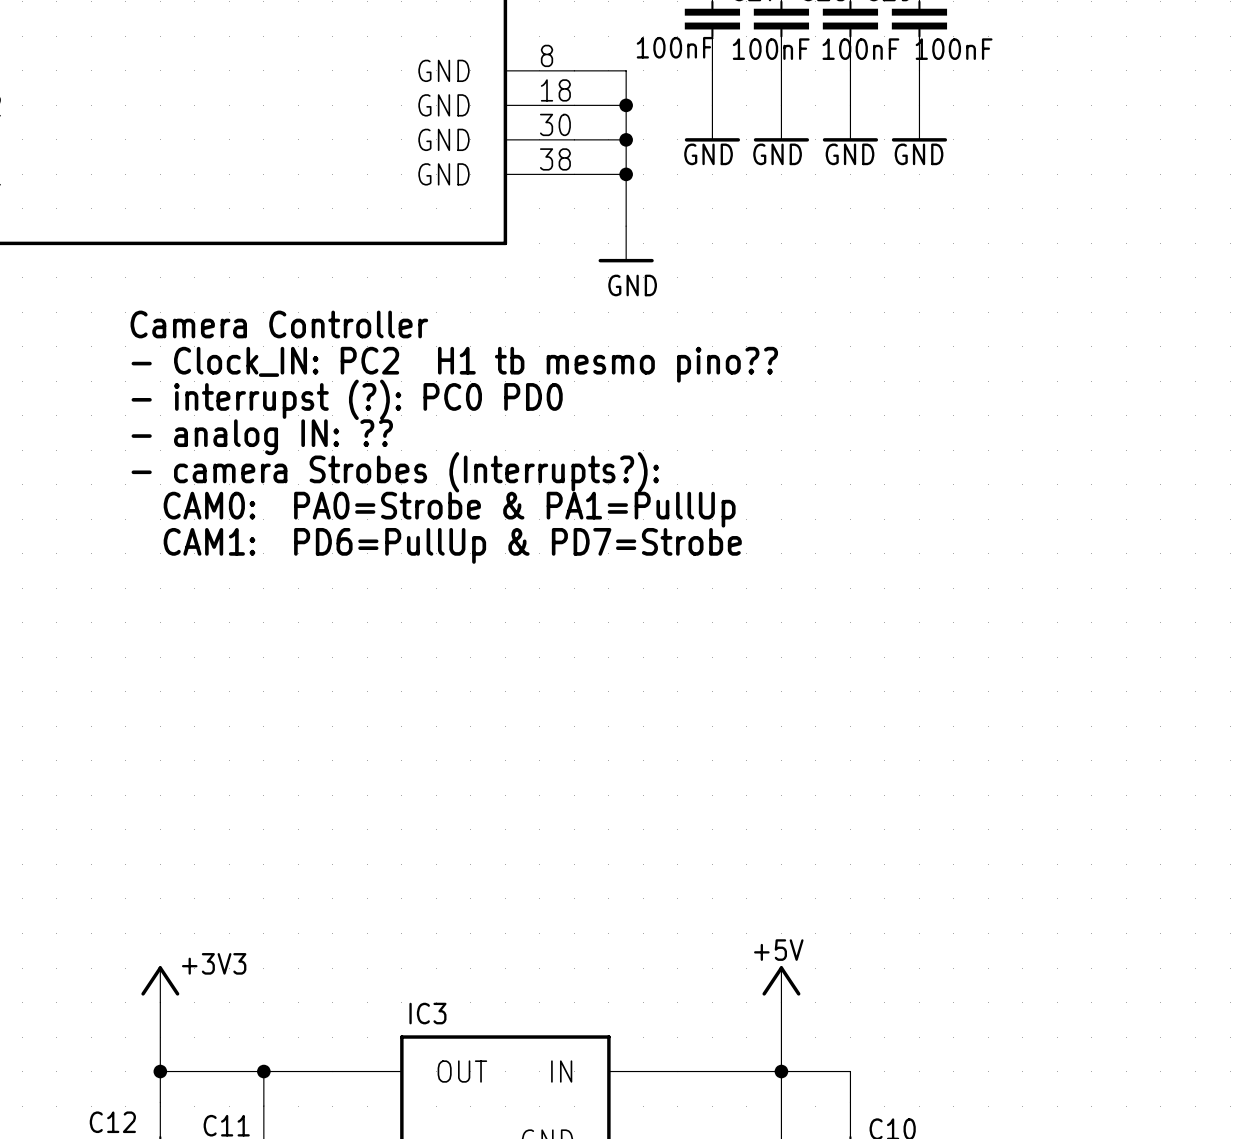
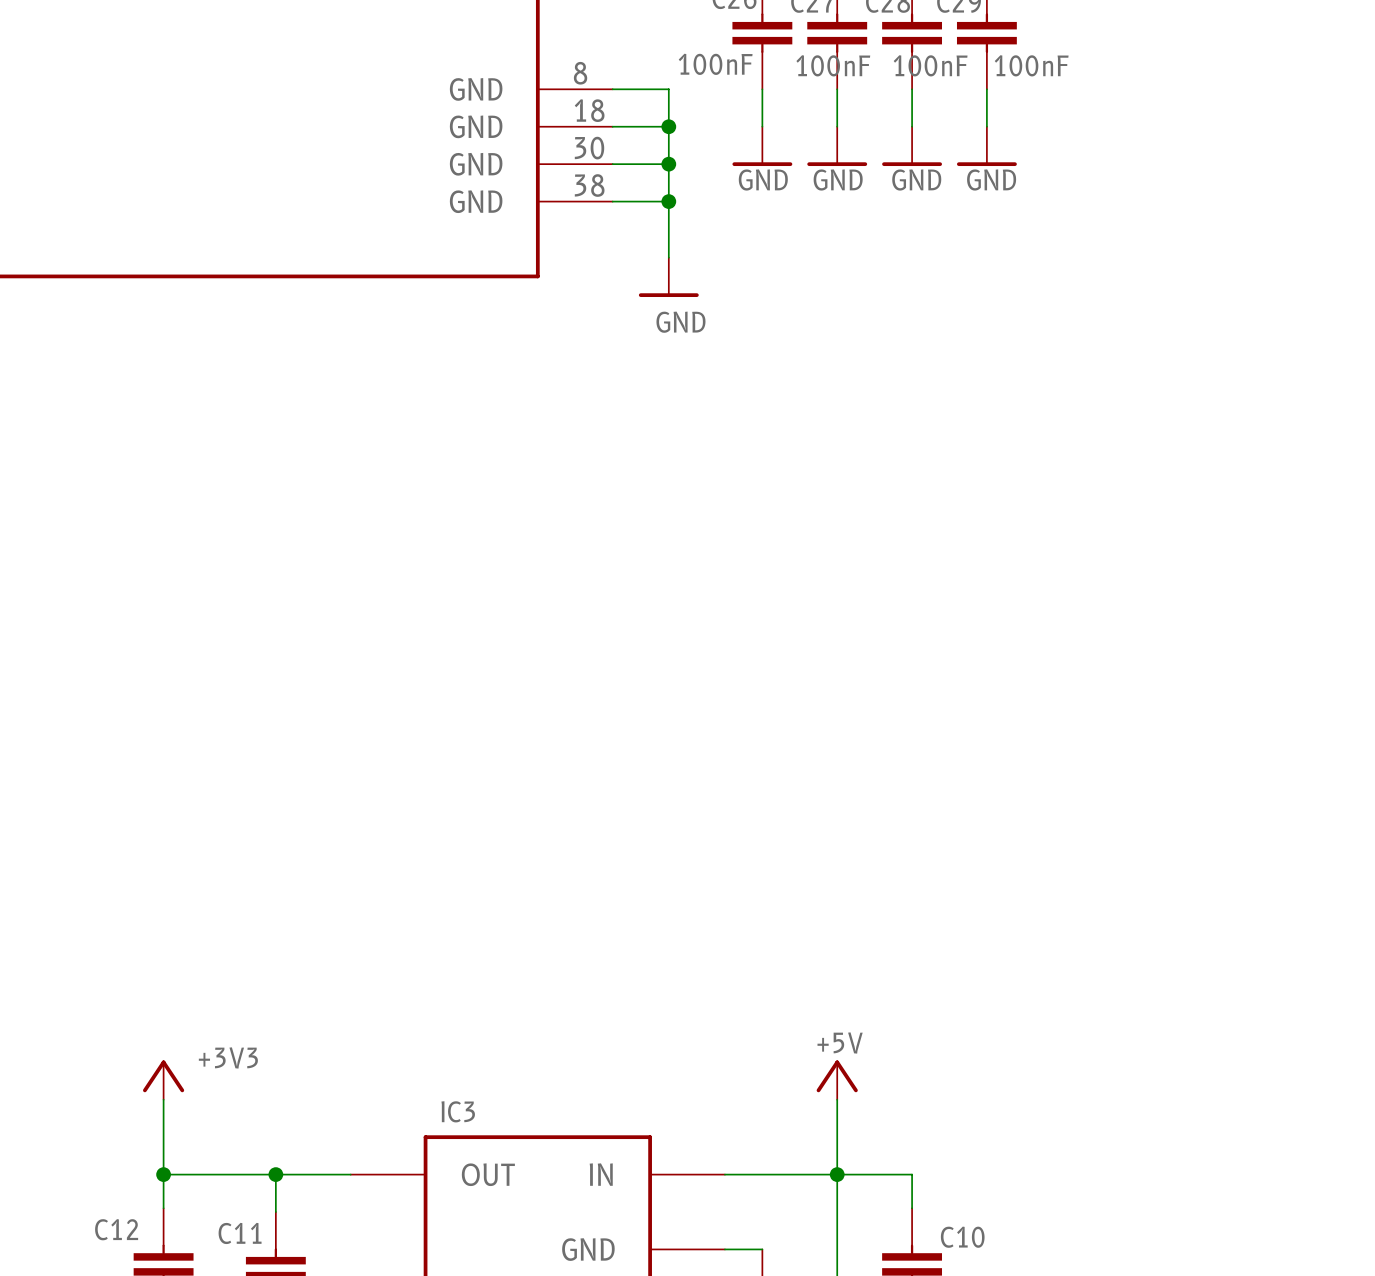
text: Camera Controller (279, 324) -> none
text: - Clock_IN: PC2 H1 tb mesmo pino?? (454, 364) -> none
text: - interrupst (?): PC0 PD0 (347, 399) -> none
text: - analog IN: ?? (262, 437) -> none
text: - camera Strobes (Interrupts?): (395, 472) -> none
text: CAM0: PA0=Strobe & PA1=PullUp (449, 509) -> none
text: CAM1: PD6=PullUp & PD7=Strobe (452, 545) -> none

